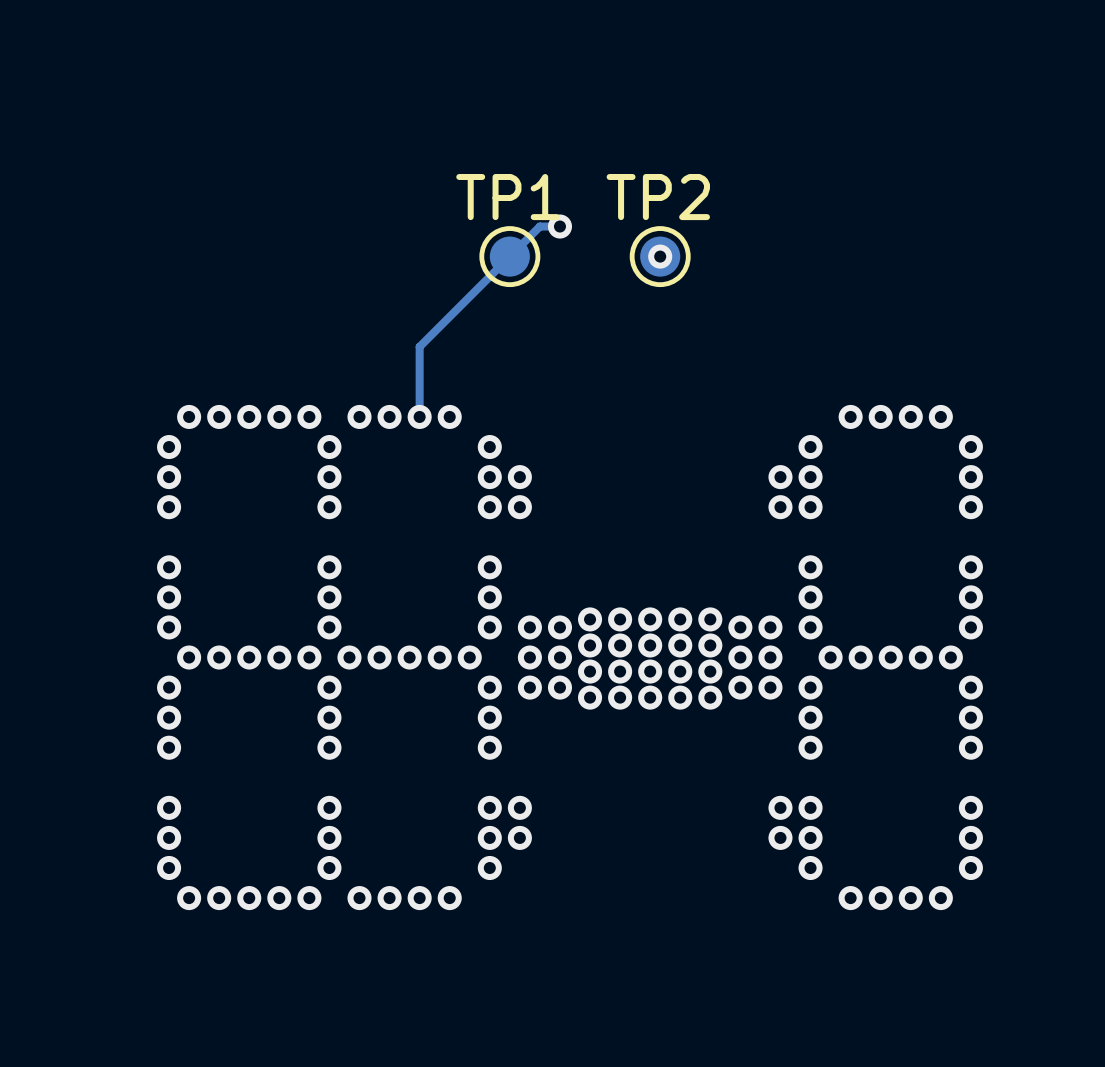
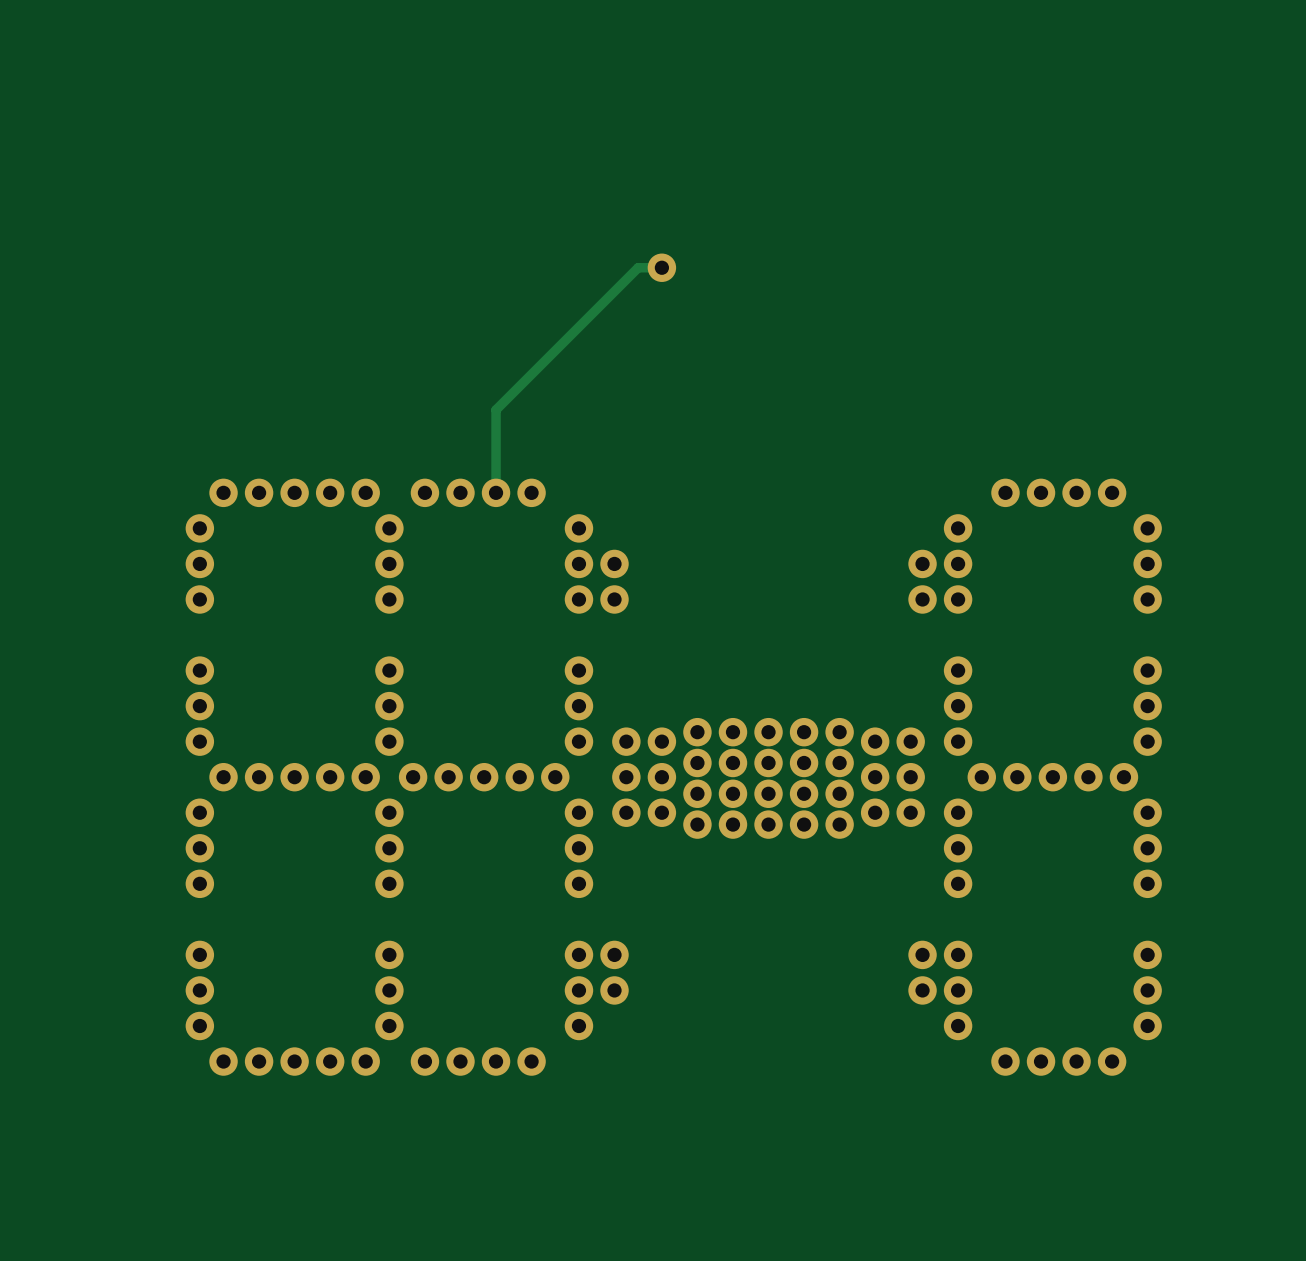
TP1: (509, 256) -> none
TP2: (660, 256) -> none
via: (660, 256) -> none

